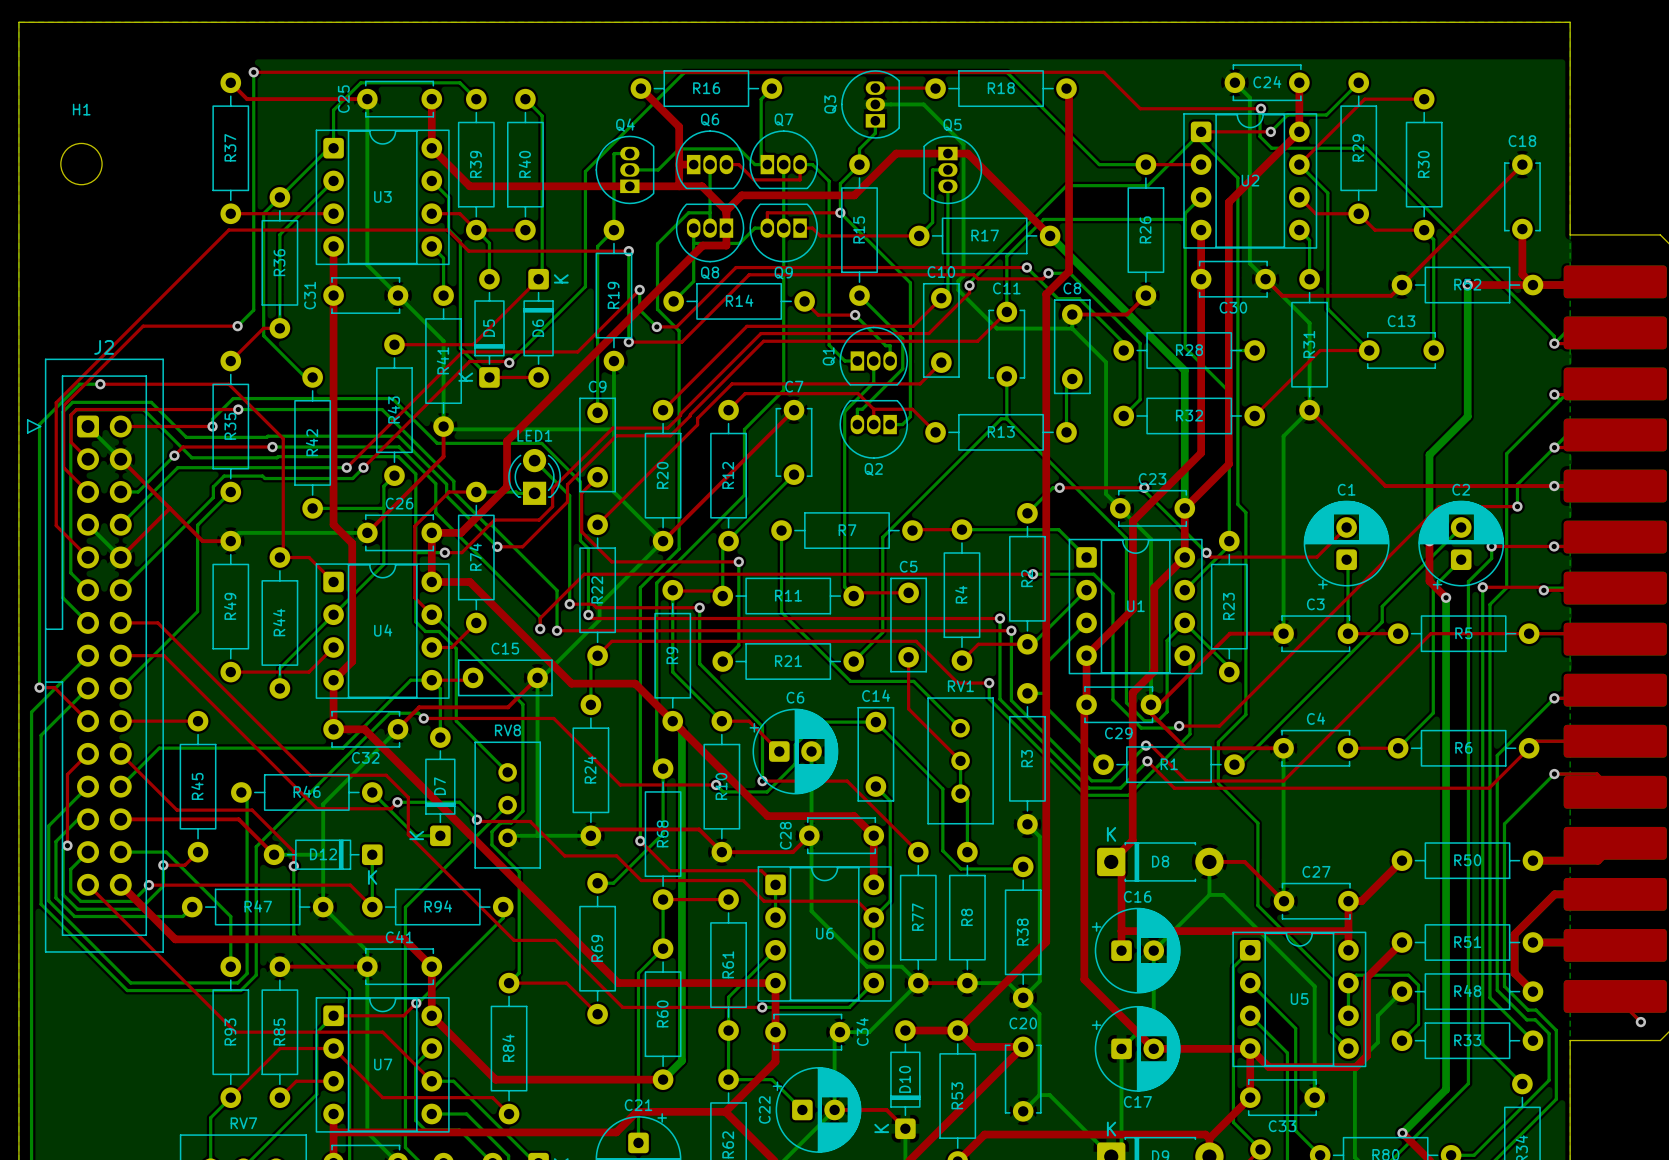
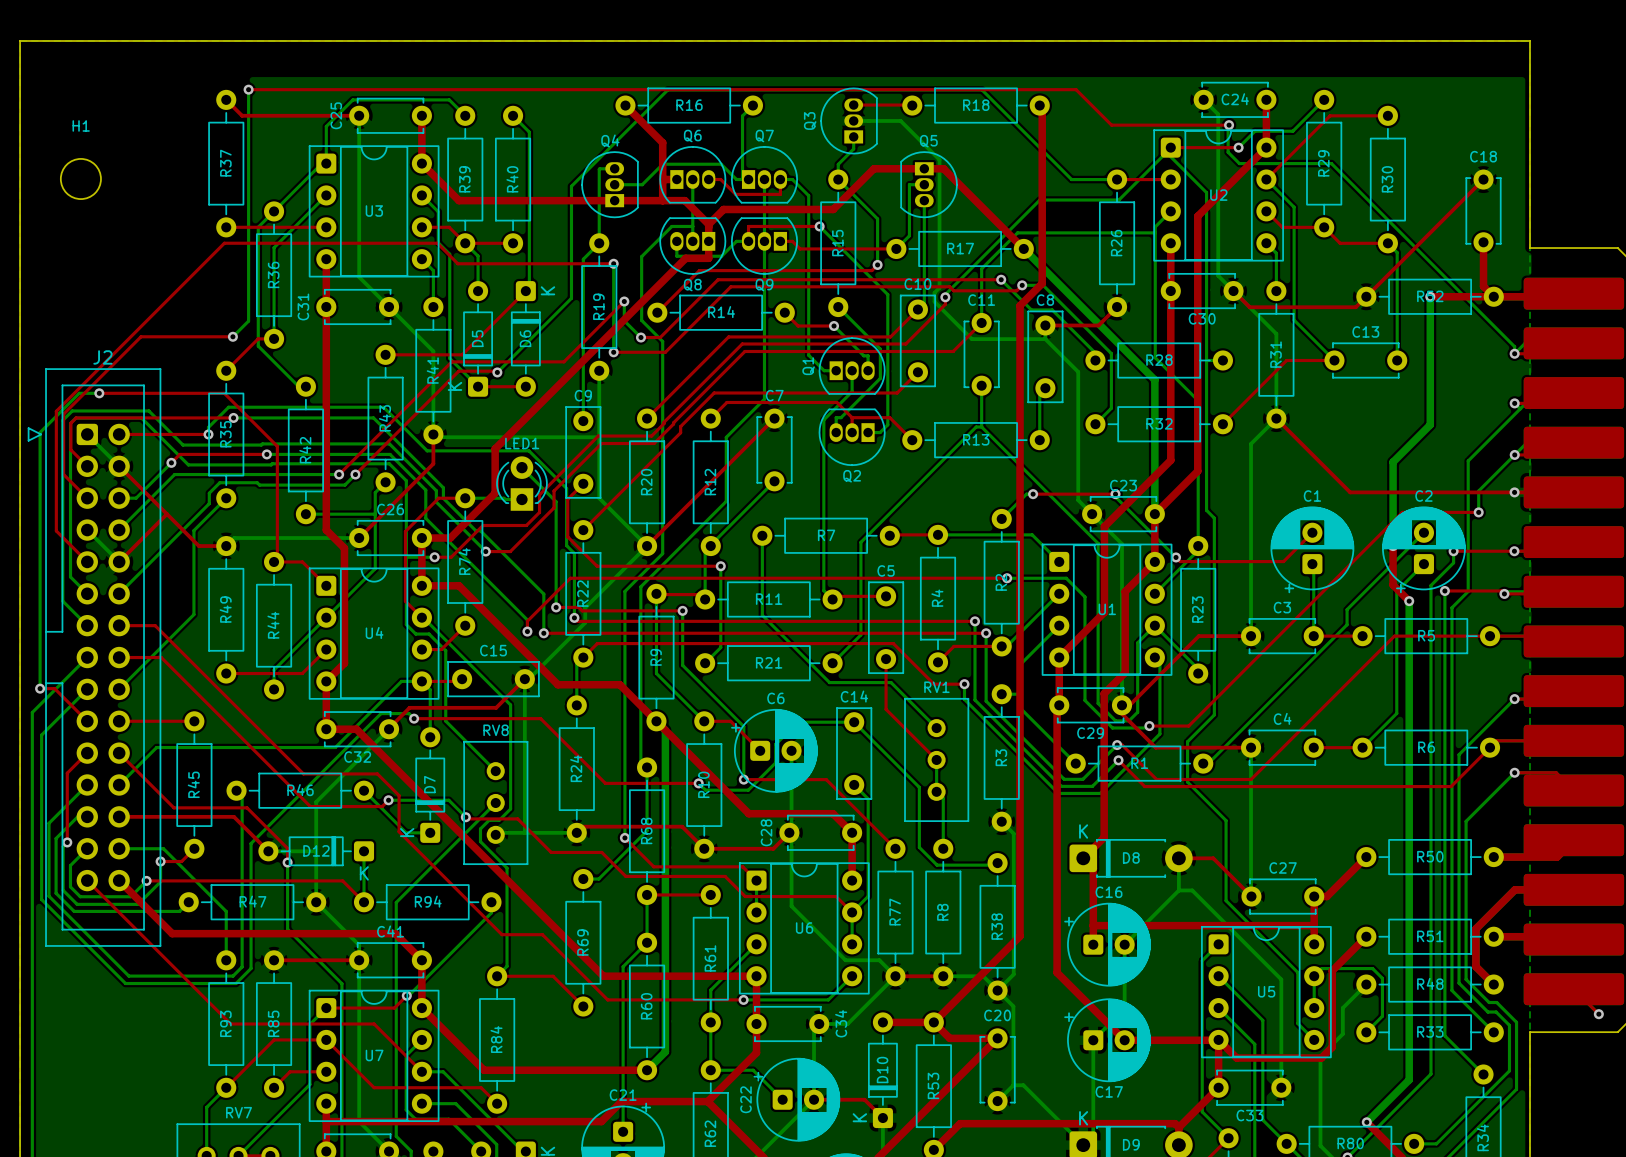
bottom track: (859, 164) (840, 183) (840, 212) -> (838, 179) (877, 218) (877, 264)
bottom track: (693, 243) (693, 281) (673, 301) -> none
top track: none -> (877, 264) (871, 270) (699, 270) (657, 312)
via: none -> (877, 264)

